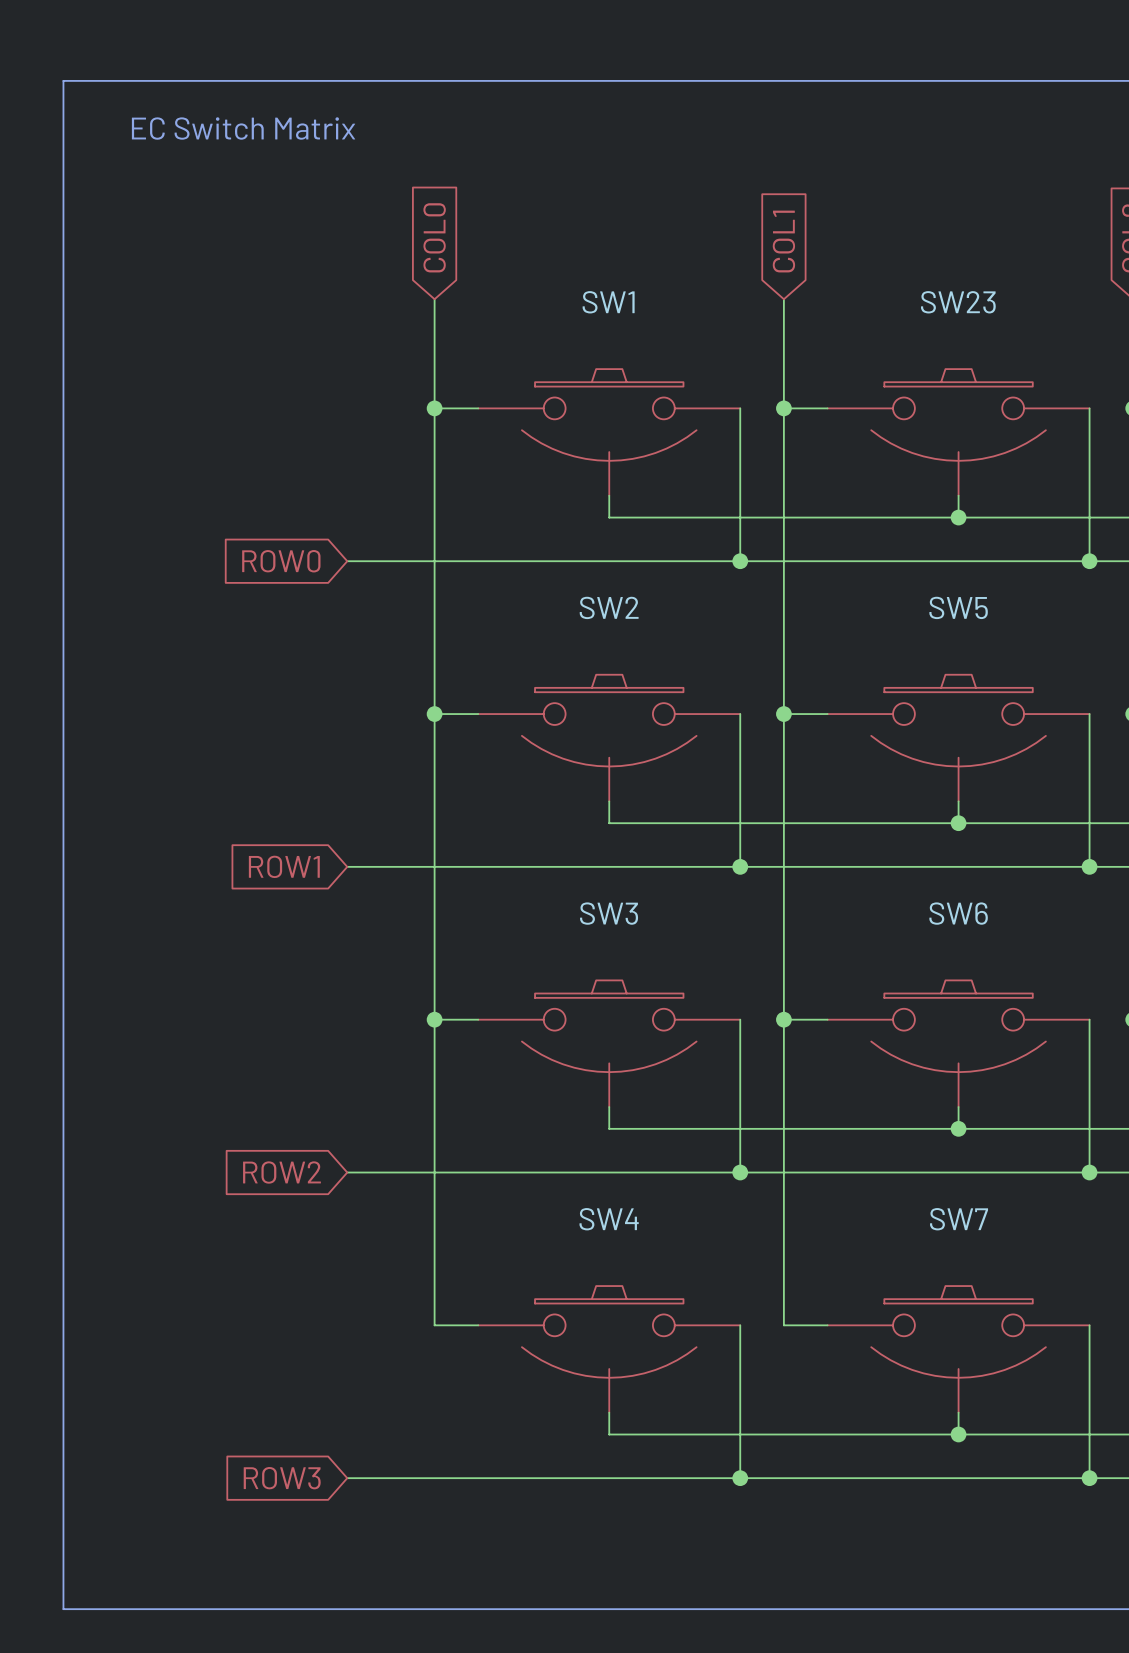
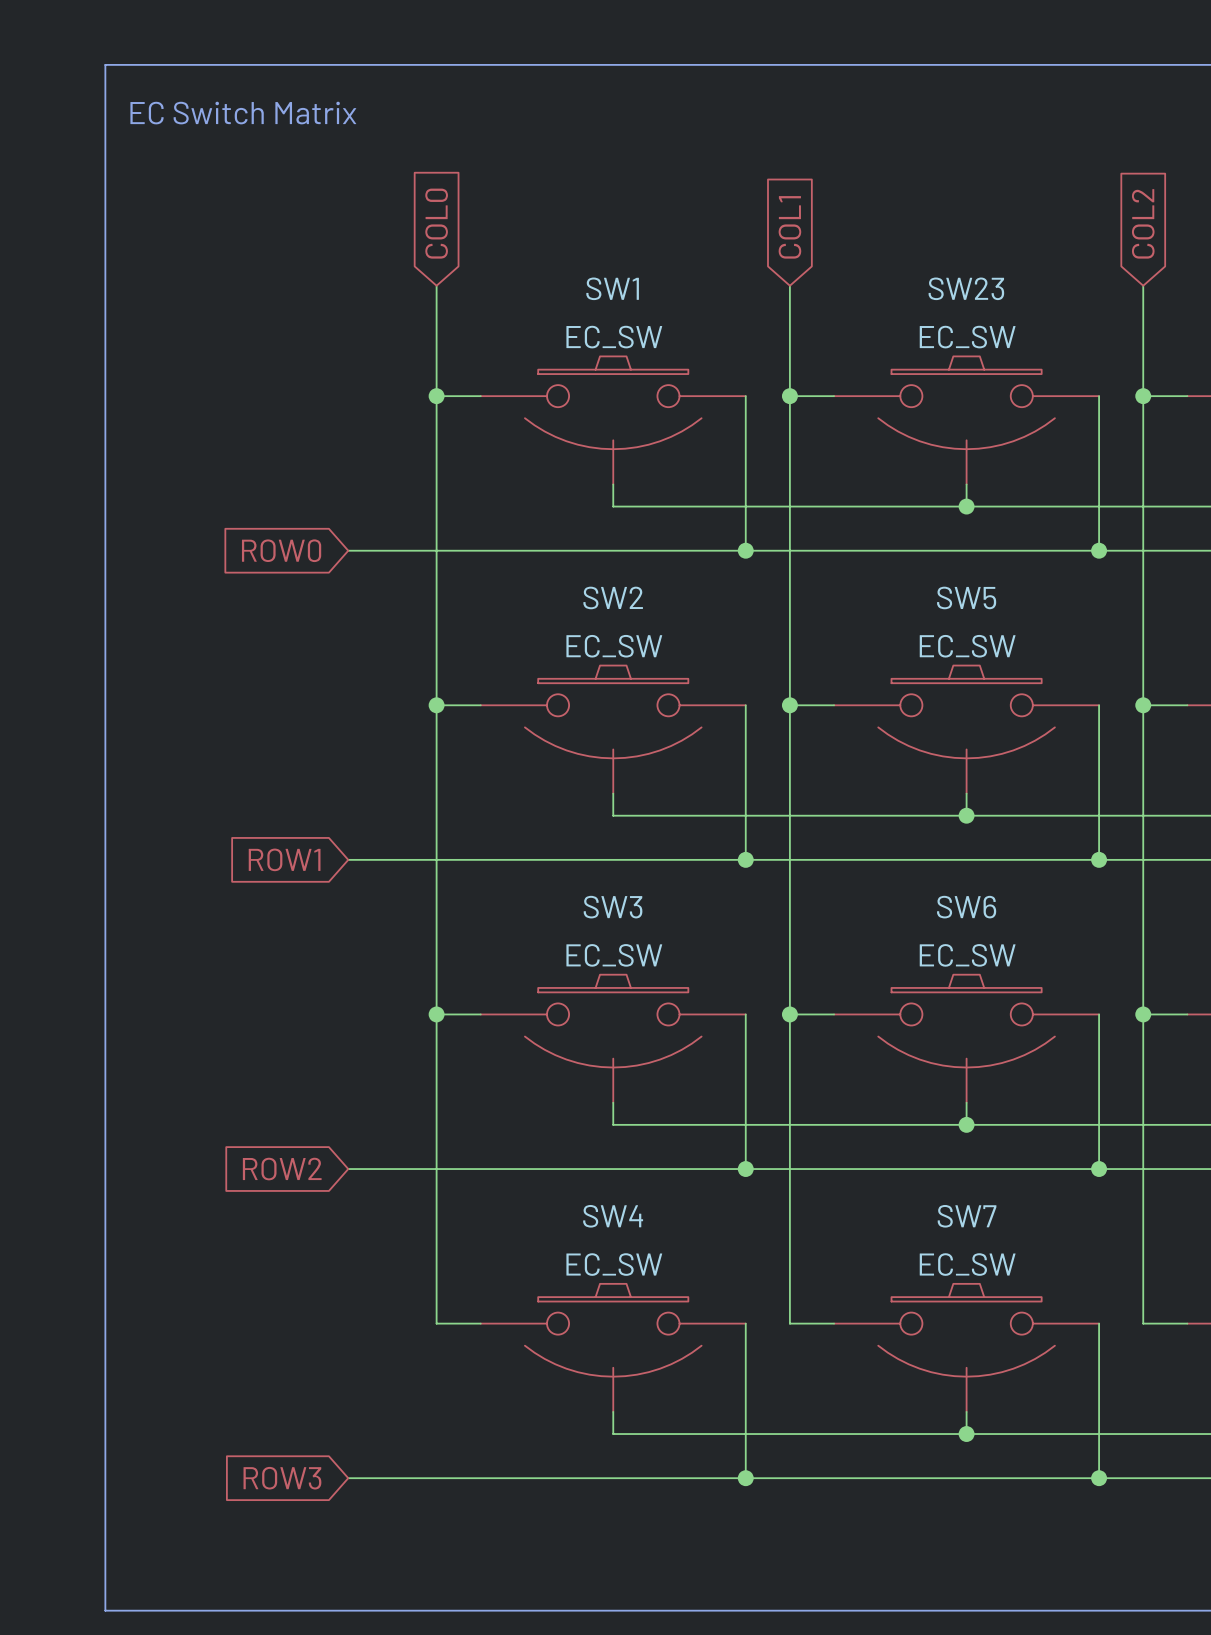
line: (107, 80) (63, 80) (63, 1609) (107, 1609) -> (105, 64) (105, 1610)
SW1 value: none -> EC_SW (614, 337)
SW23 value: none -> EC_SW (967, 337)
SW2 value: none -> EC_SW (614, 646)
SW5 value: none -> EC_SW (967, 646)
SW3 value: none -> EC_SW (614, 955)
SW6 value: none -> EC_SW (967, 955)
SW4 value: none -> EC_SW (614, 1264)
SW7 value: none -> EC_SW (967, 1264)

